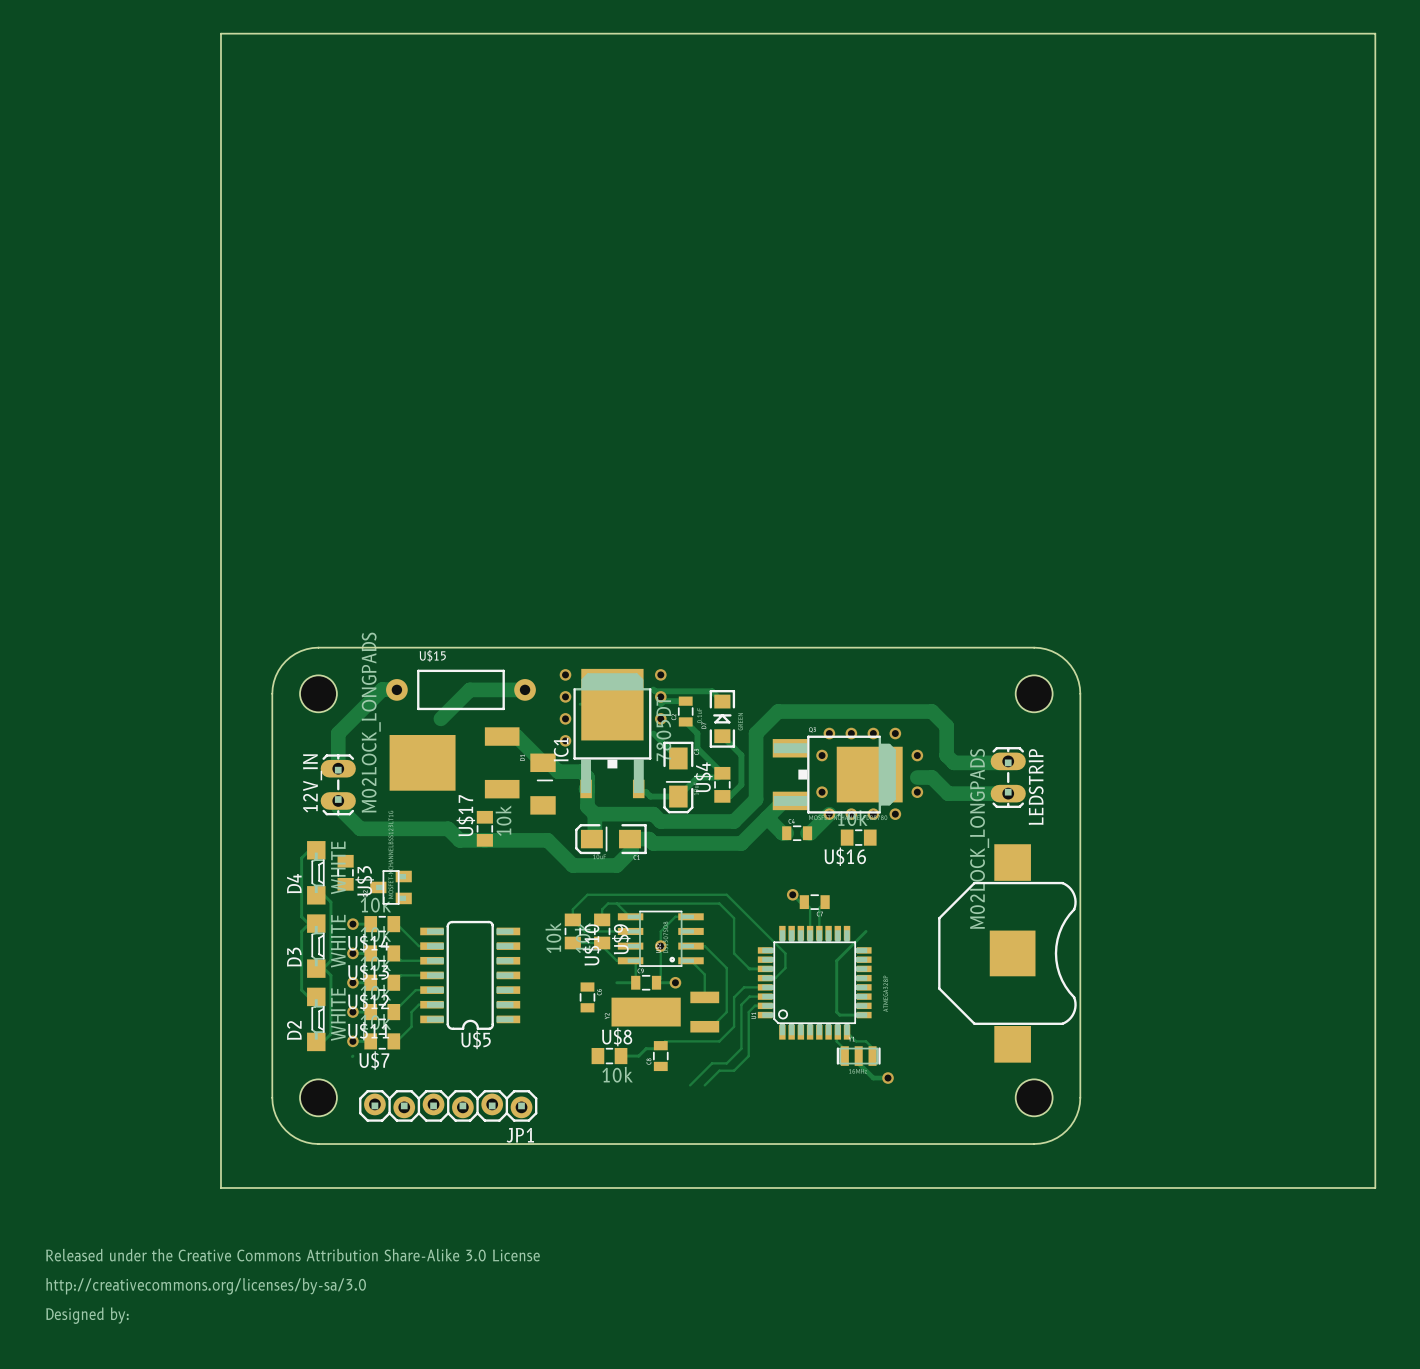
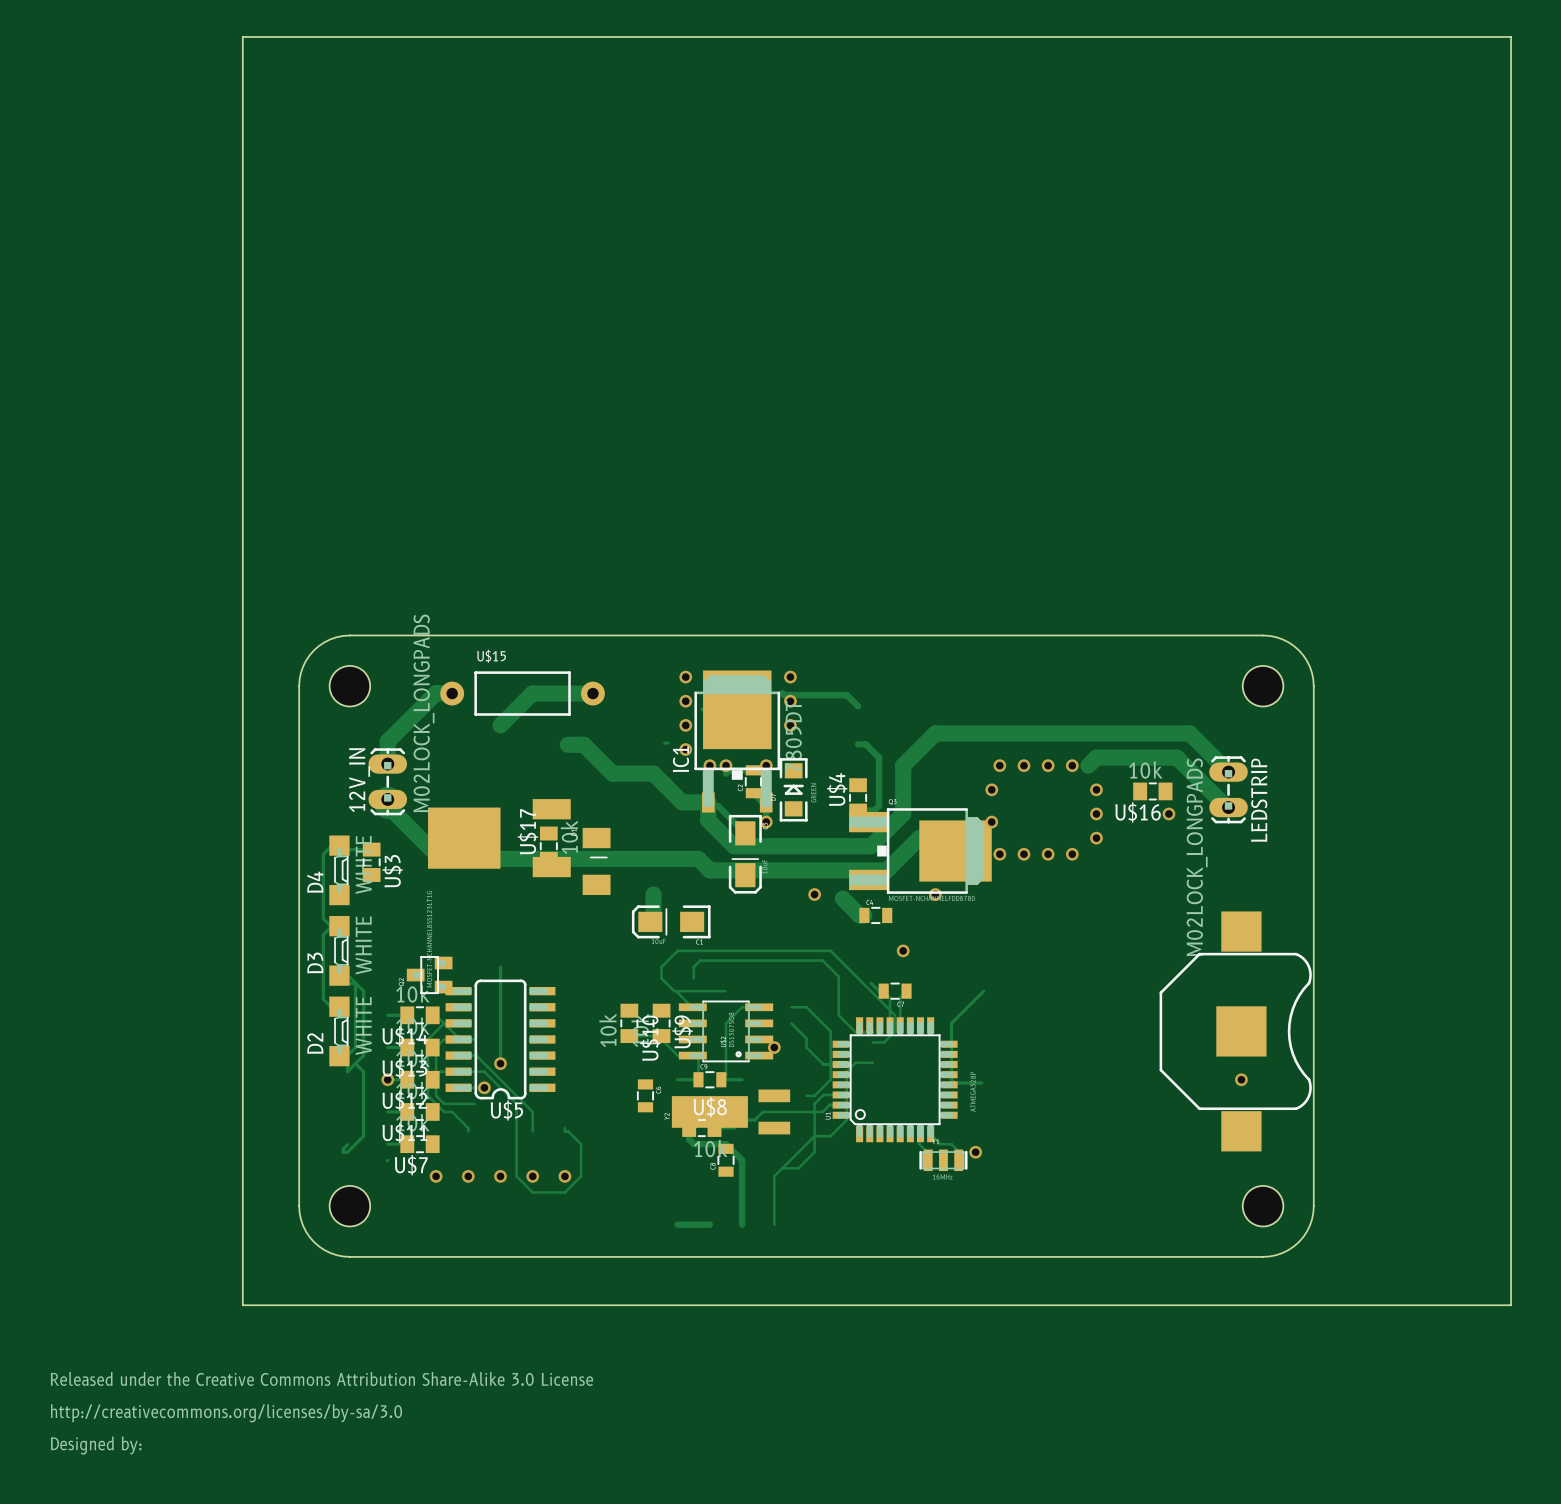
via: none -> (685, 677)
via: none -> (790, 677)
track: none -> (452, 693) (436, 693) (387, 741) (387, 764)
via: none -> (685, 701)
via: none -> (790, 701)
via: none -> (685, 725)
via: none -> (790, 725)
via: (565, 674) -> none
via: (660, 674) -> none
track: none -> (664, 743) (668, 743)
track: none -> (567, 744) (583, 744) (612, 773) (653, 773) (682, 802) (708, 802) (708, 820) (734, 846) (870, 846) (903, 813) (903, 765) (935, 733) (1189, 733) (1228, 772)
track: none -> (858, 744) (865, 744) (879, 757) (879, 805) (874, 810) (858, 810)
via: none -> (685, 749)
track: (396, 689) (382, 689) (338, 733) (338, 768) -> none
U$15 position: (460, 689) -> (522, 693)
track: (525, 689) (469, 689) (440, 718) -> (592, 693) (532, 693) (500, 725)
track: (653, 689) (655, 691) (712, 691) (722, 701) -> (782, 693) (784, 695) (846, 695) (858, 706)
via: (565, 696) -> none
via: none -> (709, 765)
via: none -> (766, 765)
via: none -> (999, 765)
via: none -> (1023, 765)
via: none -> (1048, 765)
via: none -> (1072, 765)
track: none -> (1088, 765) (1096, 757) (1176, 757) (1228, 807)
via: (565, 718) -> none
via: (660, 718) -> none
via: none -> (991, 789)
via: none -> (1096, 789)
track: none -> (387, 799) (387, 805) (440, 858) (698, 858) (709, 870) (887, 870) (919, 838) (956, 839)
IC1 position: (612, 733) -> (737, 741)
via: (829, 733) -> none
via: (851, 733) -> none
via: (873, 733) -> none
via: (895, 733) -> none
track: (502, 736) (516, 736) (543, 762) (549, 762) (558, 771) (581, 771) (587, 777) (587, 806) (594, 814) (653, 814) (660, 821) (734, 821) (756, 799) (756, 733) (778, 711) (932, 711) (946, 726) (946, 755) (953, 762) (1012, 762) -> none
track: (722, 736) (741, 755) (741, 784) (729, 796) (722, 796) -> none
via: (565, 740) -> none
via: none -> (1096, 813)
via: none -> (1168, 813)
track: (697, 748) (722, 773) (718, 777) (697, 777) (678, 796) (650, 796) (638, 788) -> none
via: none -> (766, 822)
via: none -> (991, 822)
via: (822, 755) -> none
via: (917, 755) -> none
via: none -> (1096, 838)
track: none -> (371, 849) (343, 849) (339, 845) (331, 845) (323, 854) (323, 918) (339, 934) (339, 926)
via: none -> (999, 854)
track: (917, 777) (932, 777) (948, 793) (1008, 793) -> none
via: none -> (1023, 854)
via: none -> (1048, 854)
via: none -> (1072, 854)
LEDSTRIP position: (1008, 777) -> (1228, 789)
12V_IN position: (338, 784) -> (387, 781)
U$4 position: (722, 784) -> (858, 797)
via: (822, 792) -> none
via: (917, 792) -> none
track: (792, 799) (785, 799) (741, 843) (653, 843) (649, 839) (629, 839) (631, 850) (616, 865) (572, 865) (547, 840) (459, 840) (448, 828) (360, 828) (338, 806) (338, 800) (347, 800) -> none
via: none -> (814, 894)
track: (829, 814) (810, 833) (807, 833) -> none
via: (829, 814) -> none
via: (873, 814) -> none
via: (895, 814) -> none
U$17 position: (484, 828) -> (548, 846)
U$16 position: (858, 837) -> (1152, 791)
track: (319, 853) (316, 850) (309, 850) (301, 858) (301, 916) (316, 931) (316, 923) -> none
part: none -> (806, 946)
via: none -> (903, 950)
D4 position: (316, 872) -> (339, 870)
U$3 position: (345, 872) -> (371, 862)
track: none -> (500, 967) (500, 1063)
track: none -> (347, 975) (355, 983) (355, 1047) (339, 1063) (335, 1063)
track: none -> (693, 978) (693, 967) (700, 960) (822, 960) (838, 976) (838, 1015) (855, 1032) (872, 1032)
via: (792, 894) -> none
part: (676, 895) -> none
track: (602, 919) (602, 909) (608, 903) (719, 903) (734, 918) (734, 945) -> (791, 1023) (806, 1038)
track: (308, 924) (301, 931) (301, 990) (308, 996) (316, 996) -> (331, 926) (323, 934) (323, 999) (330, 1006) (339, 1006)
via: (352, 924) -> none
track: none -> (458, 1023) (444, 1023) (428, 1039) (428, 1095) (444, 1111) (452, 1111) (468, 1128) (468, 1131)
track: (630, 931) (584, 931) (572, 919) (572, 909) (587, 894) (726, 894) (785, 953) (785, 968) (775, 978) (765, 978) -> (725, 991) (674, 991) (661, 978) (661, 967) (677, 950) (830, 950) (895, 1015) (895, 1031) (884, 1042) (872, 1042)
track: (866, 931) (836, 960) (836, 1012) (839, 1015) (864, 1015) -> (983, 991) (951, 1023) (951, 1079) (954, 1083) (981, 1083)
D3 position: (316, 946) -> (339, 950)
via: (660, 946) -> none
track: (690, 946) (704, 946) (726, 968) (726, 1012) (712, 1026) (704, 1026) -> (791, 1007) (806, 1007) (830, 1031) (830, 1079) (814, 1095) (806, 1095)
via: (352, 953) -> none
track: (393, 953) (401, 960) (417, 960) -> none
via: none -> (774, 1047)
part position: (1007, 953) -> (1235, 1031)
track: none -> (474, 1055) (532, 1111) (532, 1131)
track: (690, 960) (704, 974) (704, 997) -> none
track: none -> (872, 1062) (855, 1062) (846, 1071) (846, 1120) (830, 1136) (814, 1136) (782, 1168)
via: none -> (500, 1063)
track: none -> (474, 1071) (484, 1071) (516, 1103) (516, 1176) (532, 1192) (564, 1192) (581, 1176) (581, 1144) (568, 1131) (564, 1131) (564, 1128)
U$5 position: (470, 975) -> (500, 1039)
via: (675, 982) -> none
via: none -> (1241, 1079)
track: (765, 987) (744, 987) (734, 997) (734, 1026) (719, 1041) (665, 1041) (657, 1048) (646, 1048) (638, 1056) (621, 1056) -> none
track: (417, 990) (393, 1012) -> none
via: none -> (484, 1087)
track: (418, 1004) (411, 1012) (411, 1026) (396, 1041) (393, 1041) -> (460, 1103) (444, 1103) (436, 1095) (436, 1047) (444, 1039) (458, 1039)
via: (352, 1012) -> none
track: (748, 1012) (748, 1056) (734, 1070) (719, 1070) (704, 1085) -> (822, 1111) (762, 1111) (754, 1120) (742, 1120) (734, 1128) (714, 1128)
D2 position: (316, 1019) -> (339, 1031)
track: none -> (689, 1128) (689, 1139) (693, 1144) (726, 1144) (742, 1160) (742, 1224)
via: (352, 1041) -> none
U$8 position: (609, 1056) -> (701, 1128)
track: (858, 1056) (858, 1063) (873, 1078) (888, 1078) -> none
via: none -> (436, 1176)
via: none -> (468, 1176)
via: none -> (500, 1176)
via: none -> (532, 1176)
via: none -> (564, 1176)
track: (704, 1070) (690, 1085) -> (774, 1176) (774, 1224)
via position: (888, 1078) -> (975, 1152)
JP1: (448, 1105) -> none
track: none -> (677, 1224) (709, 1224)

